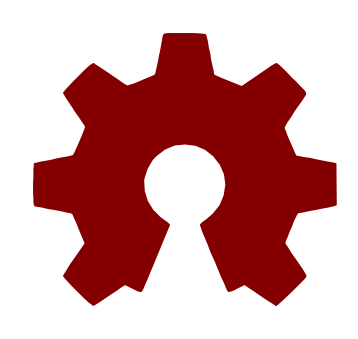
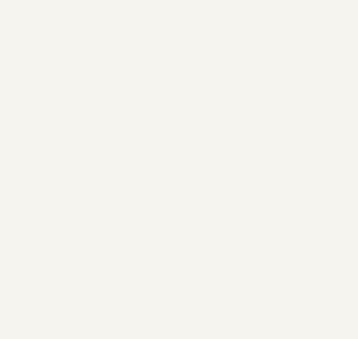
power symbol: (184, 169) -> none

